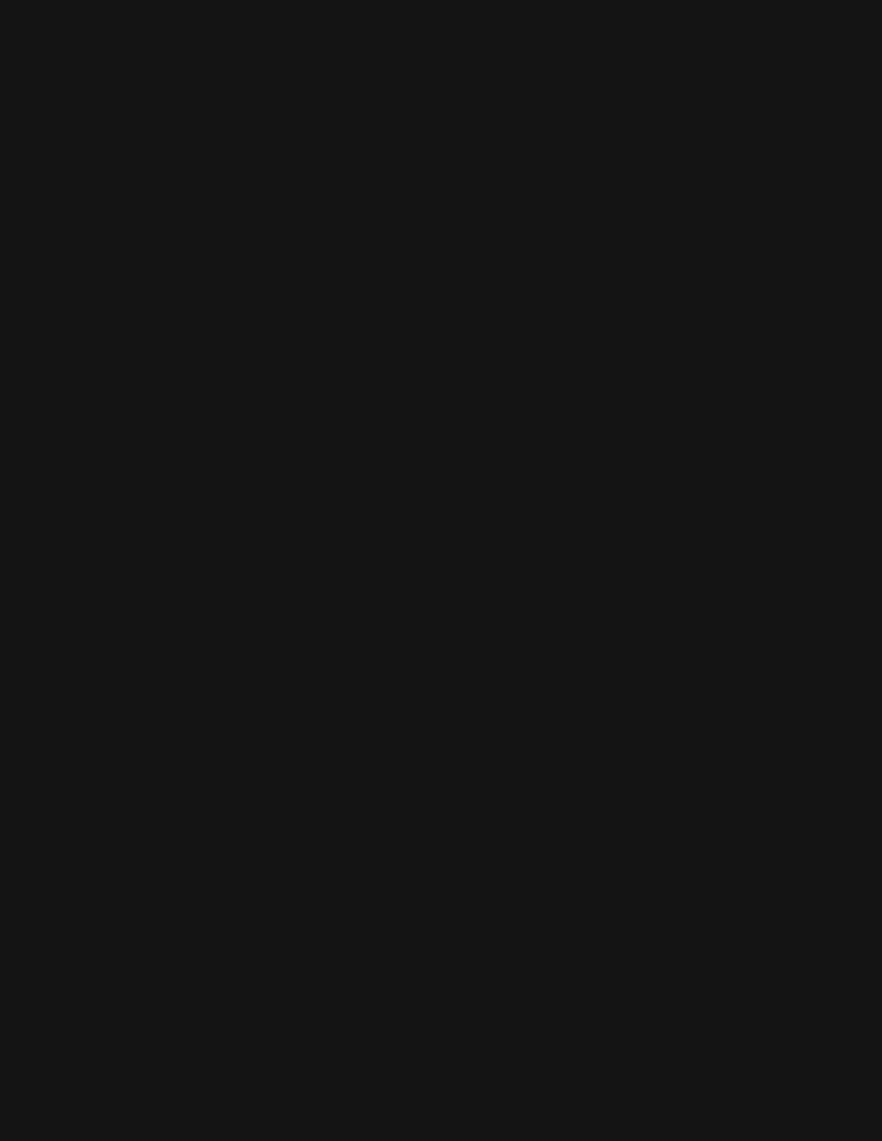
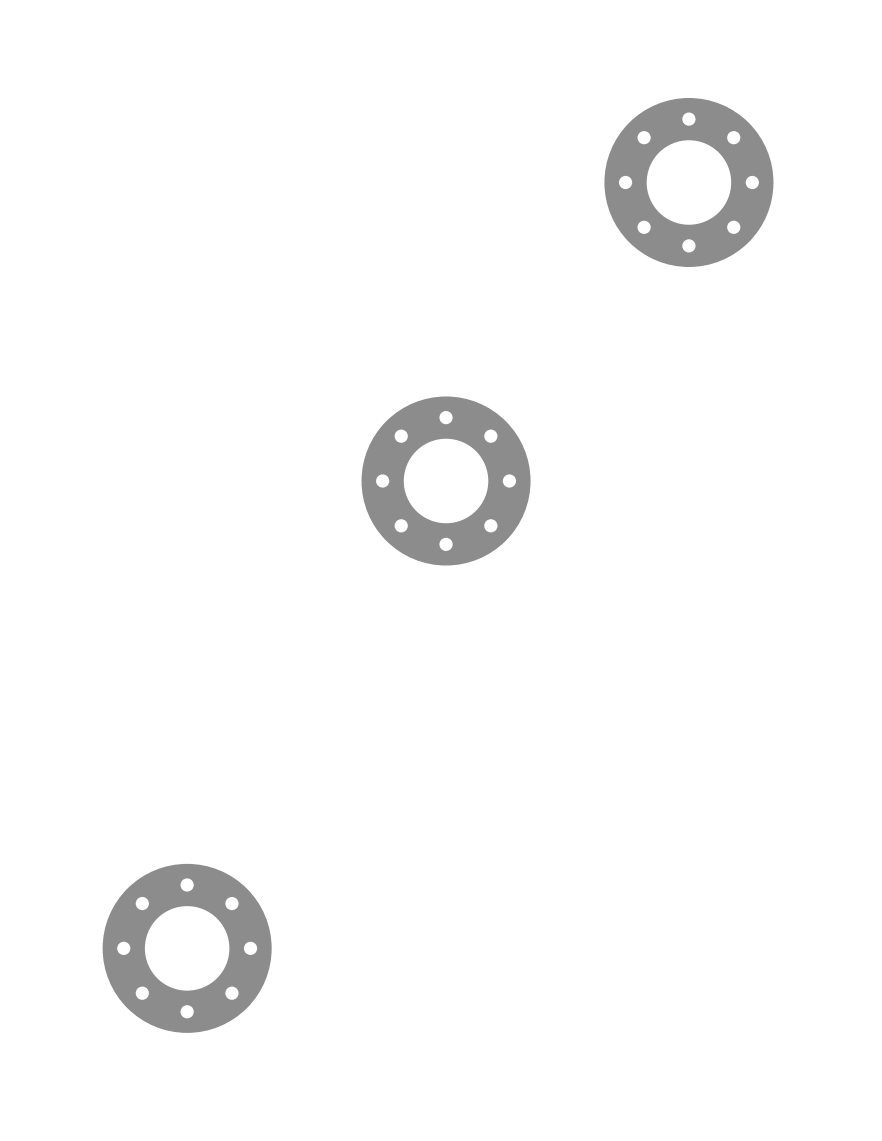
part: none -> (688, 182)
part: none -> (446, 481)
part: none -> (187, 948)

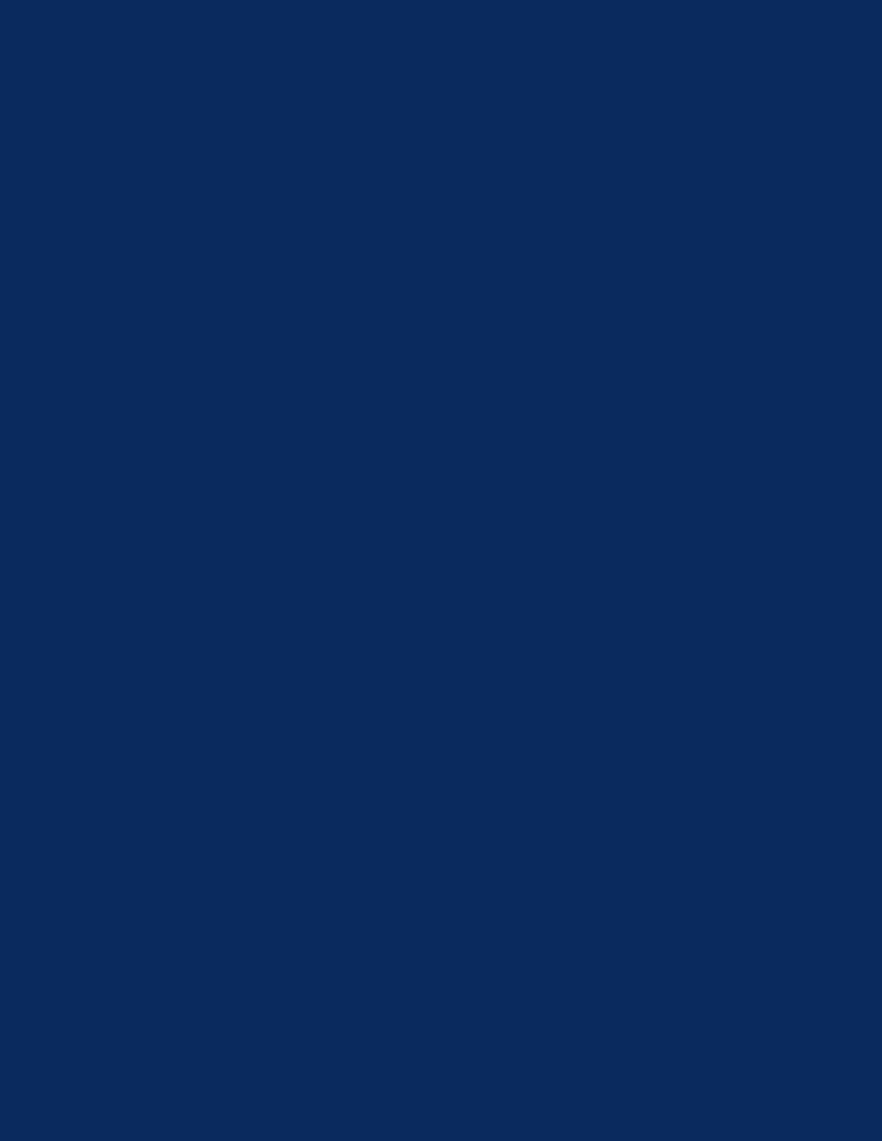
part: (688, 182) -> none
part: (446, 481) -> none
part: (187, 948) -> none

